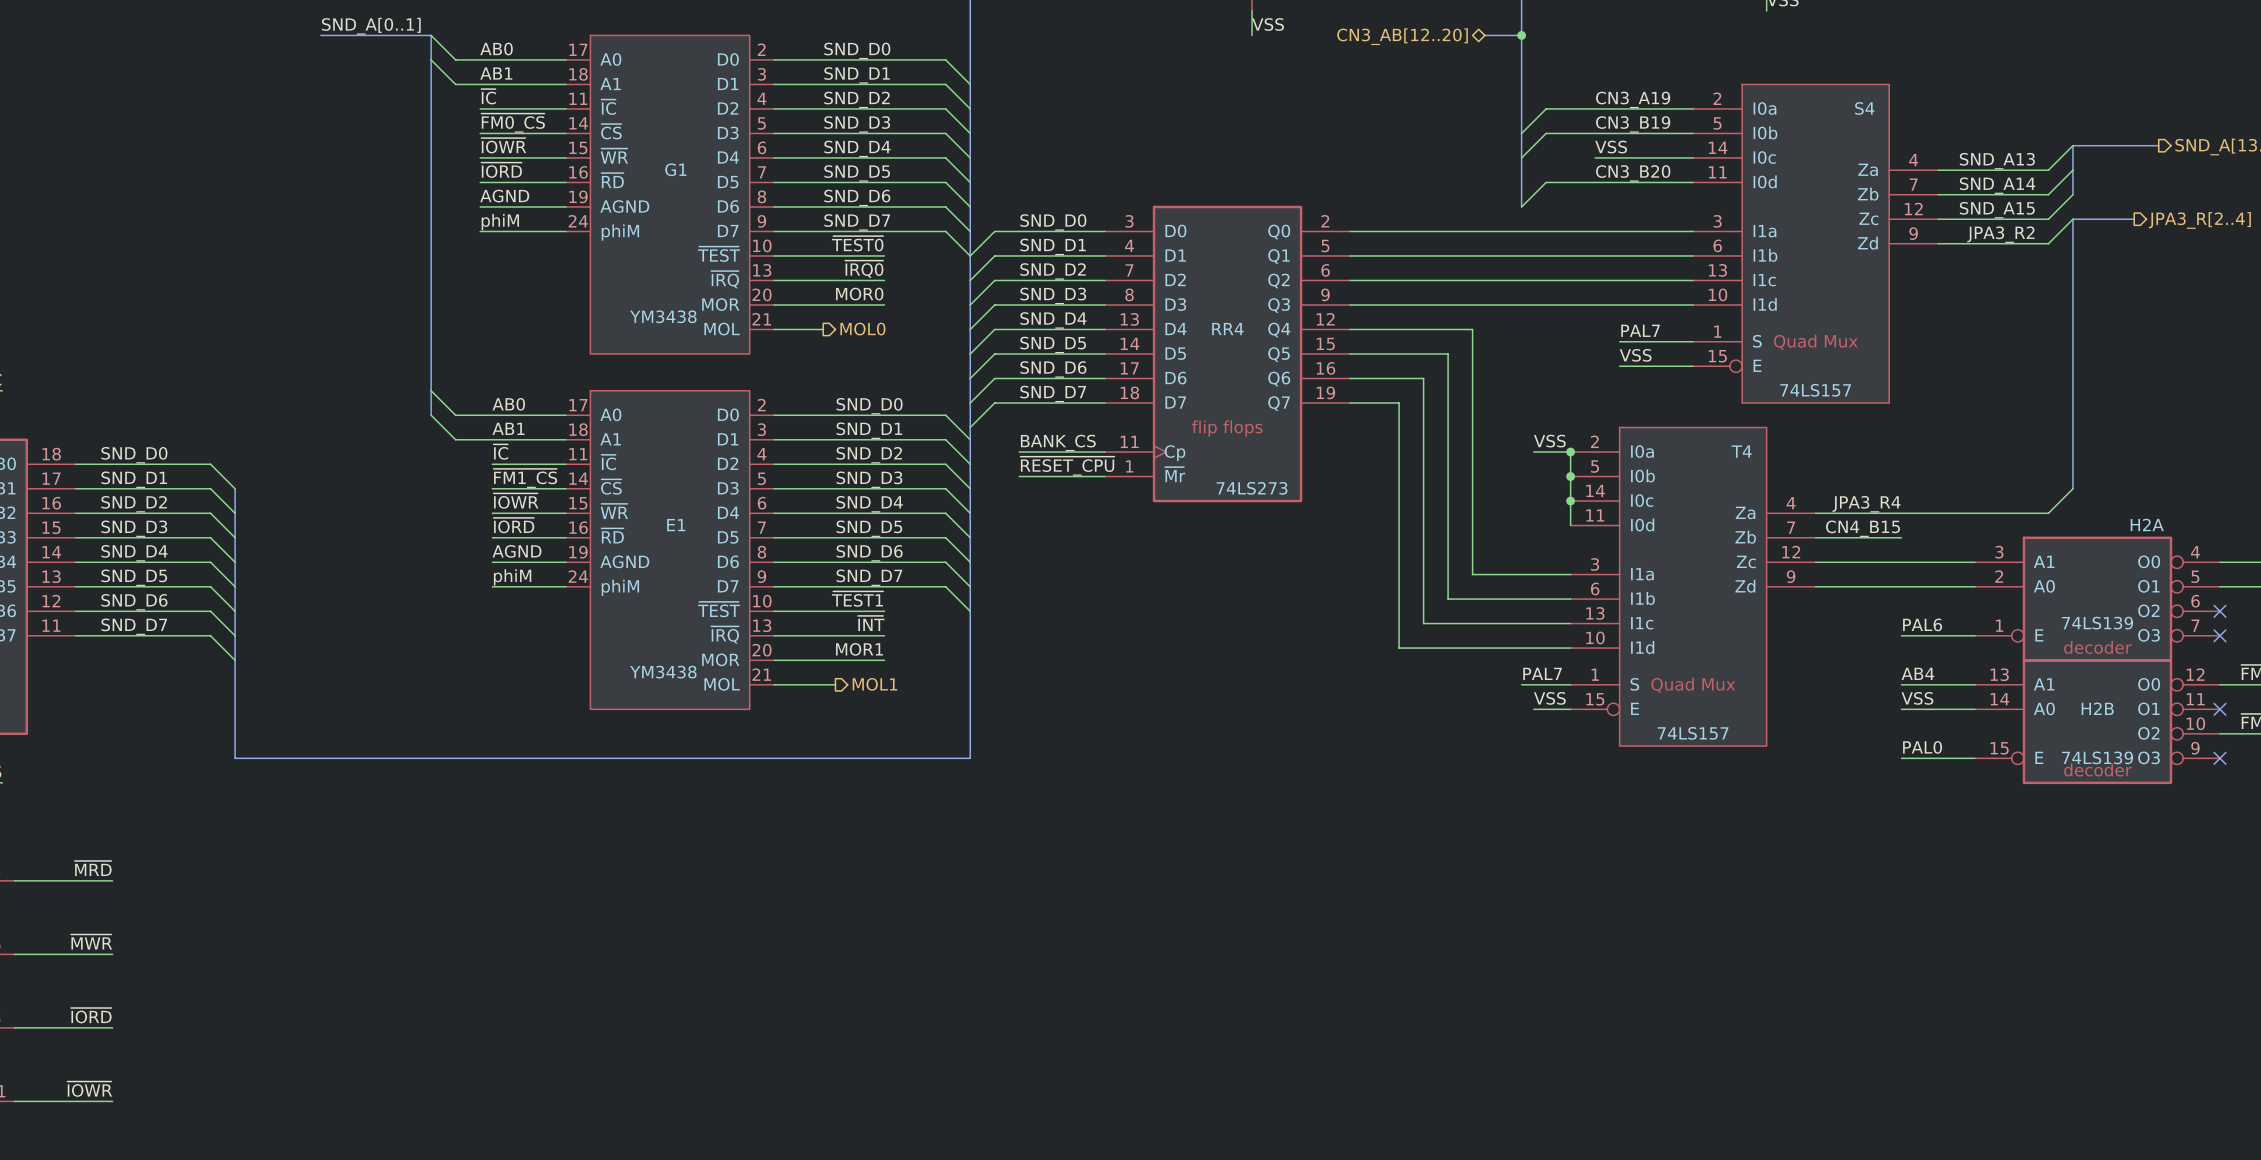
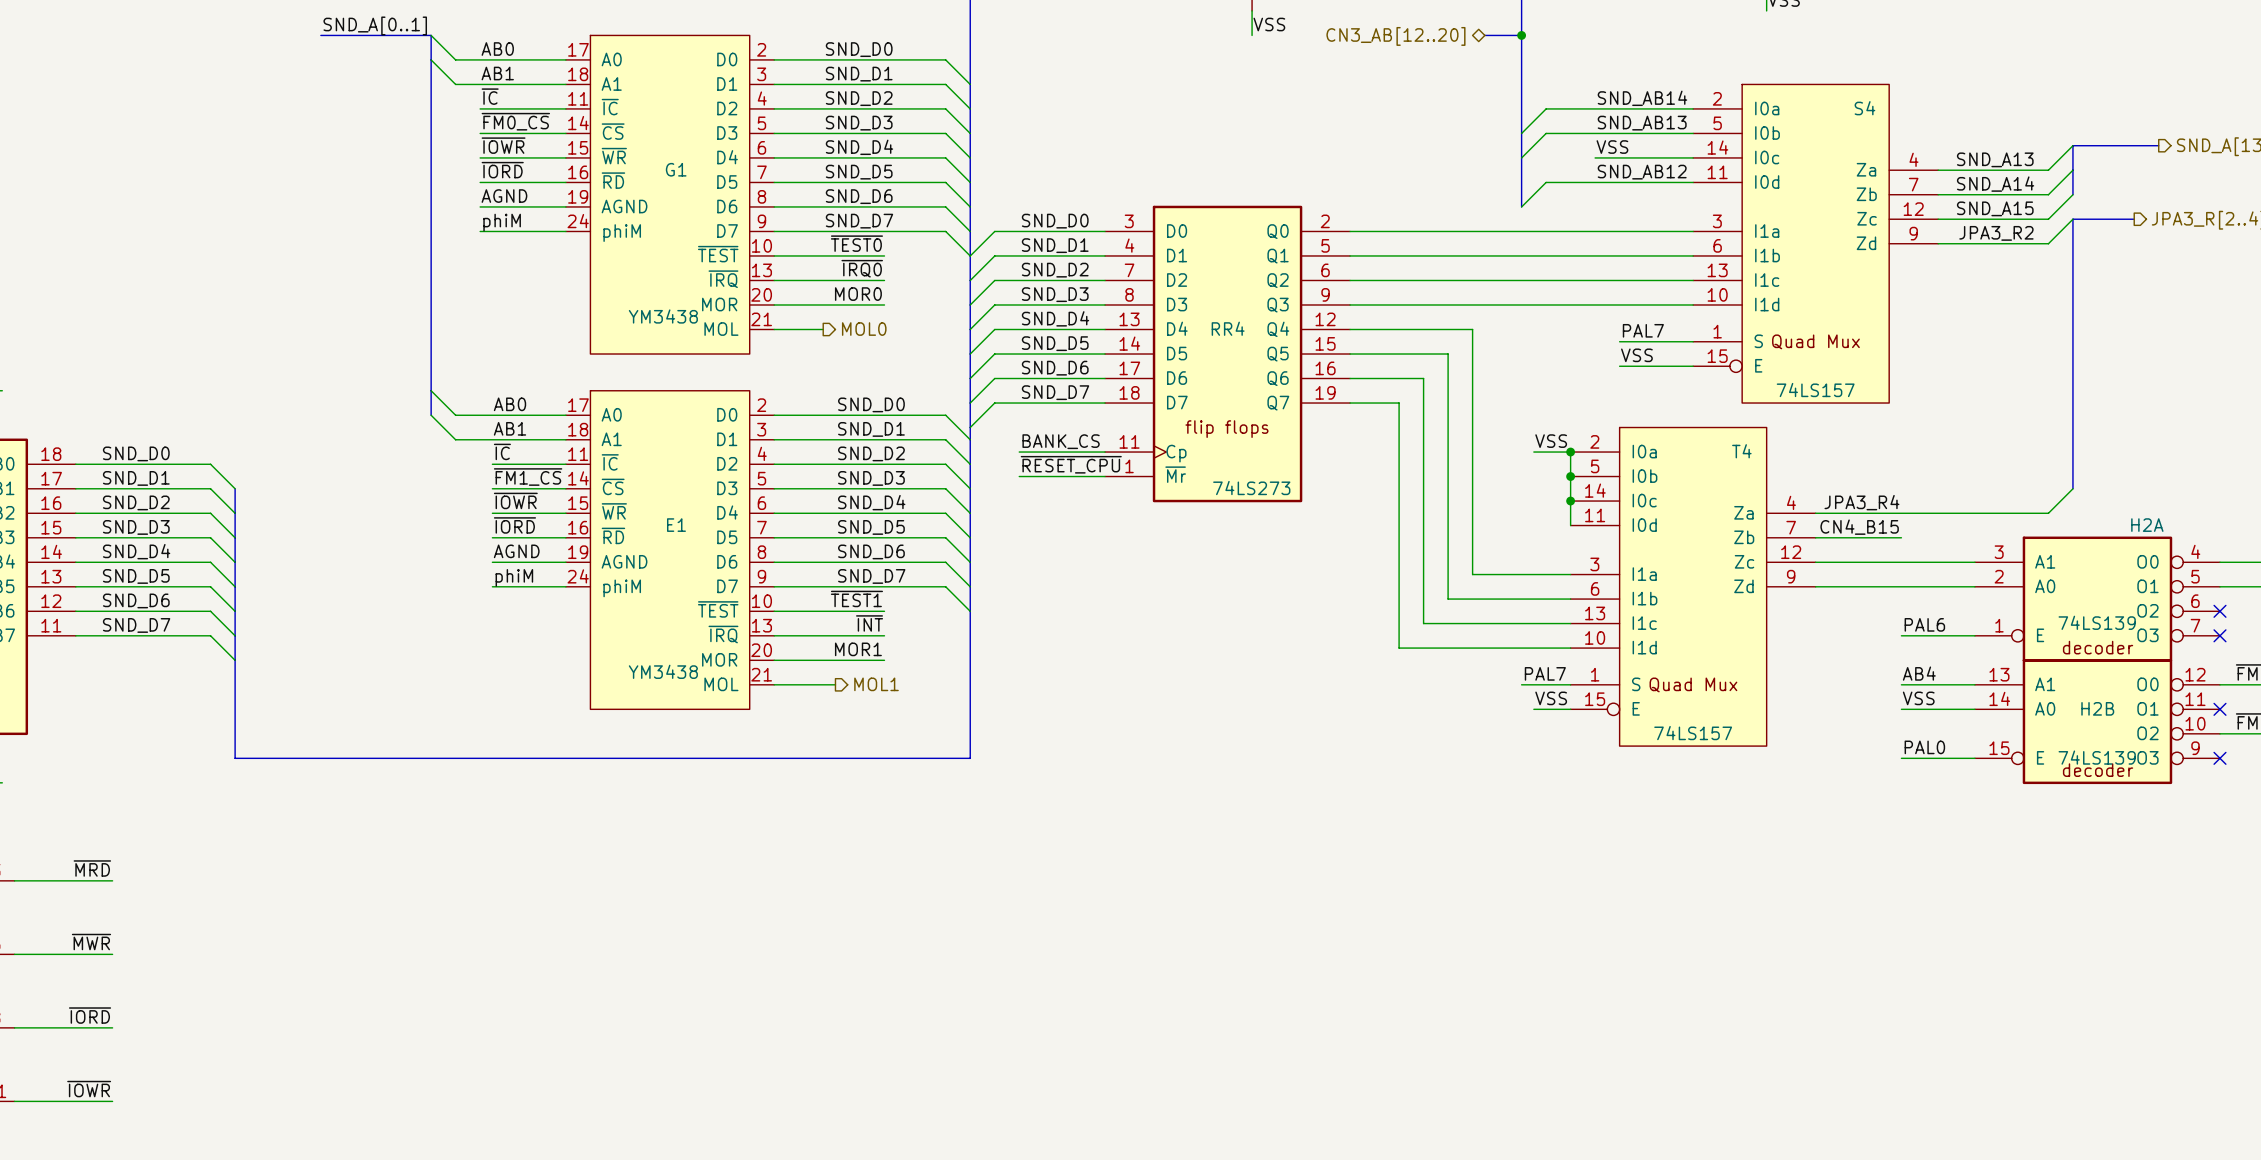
label: CN3_A19 (1633, 99) -> SND_AB14 (1642, 98)
label: CN3_B19 (1633, 124) -> SND_AB13 (1642, 123)
label: CN3_B20 (1633, 173) -> SND_AB12 (1642, 172)

